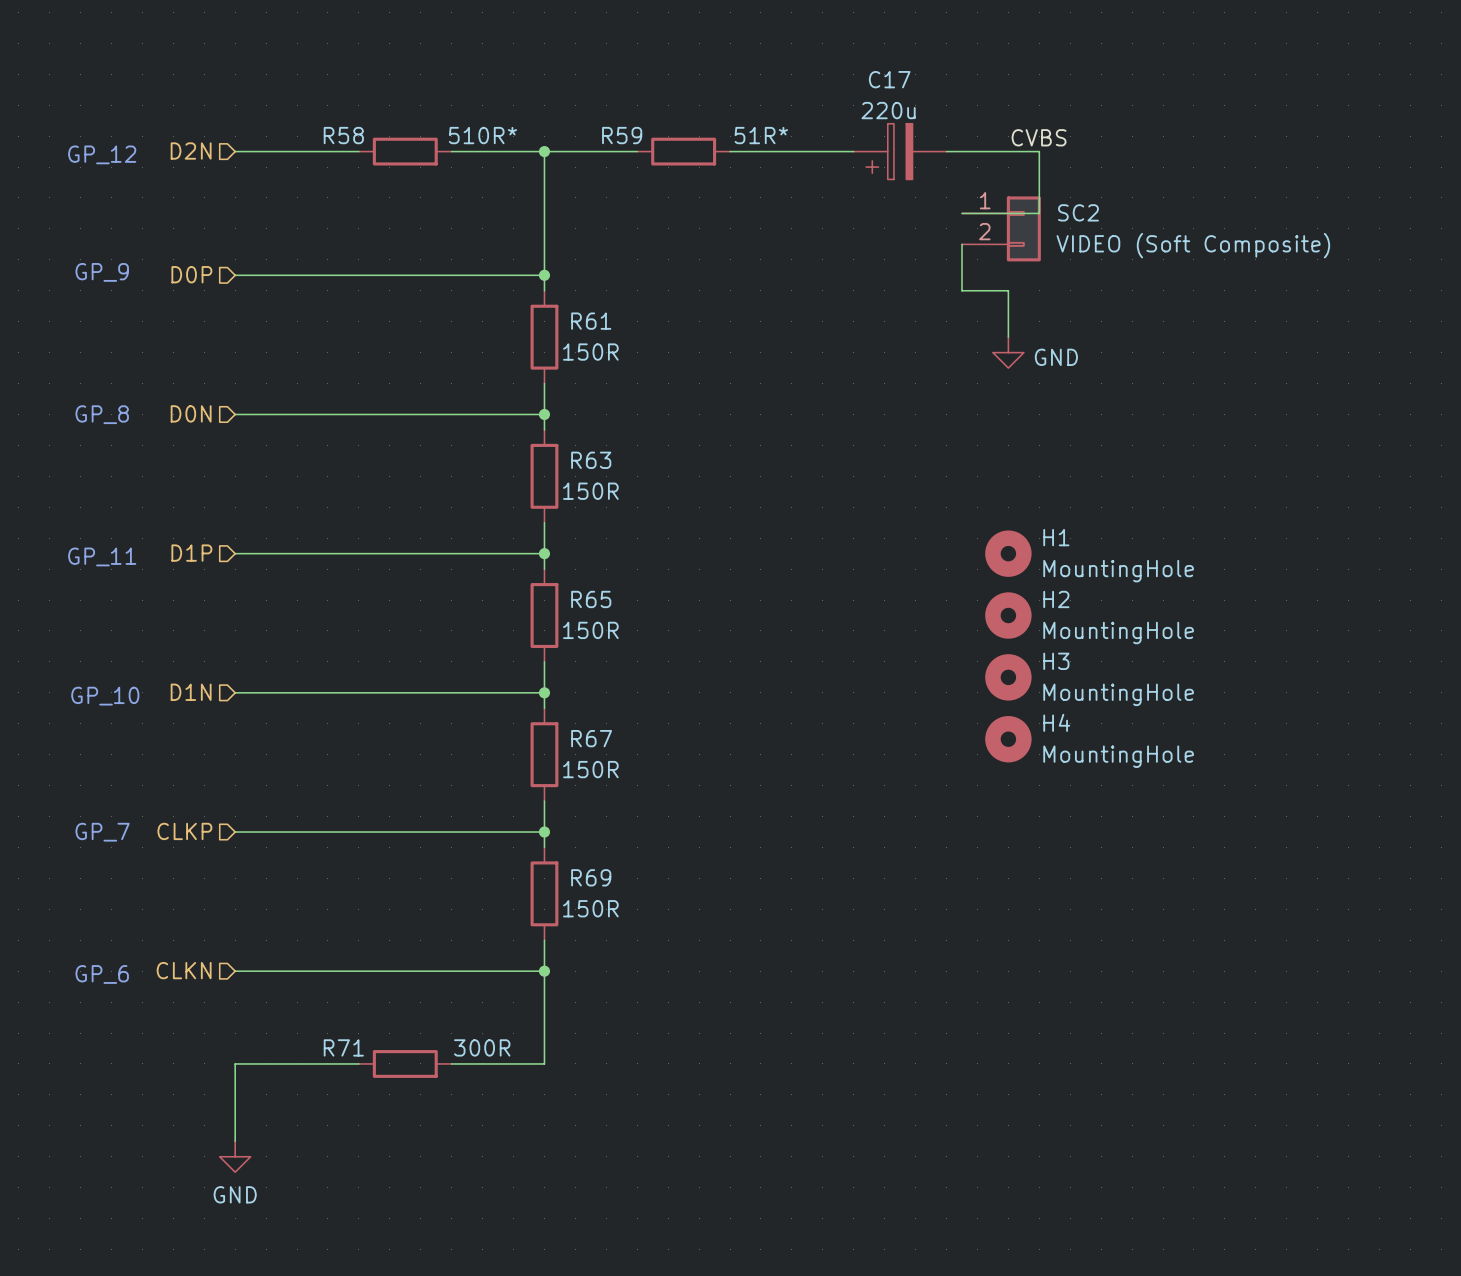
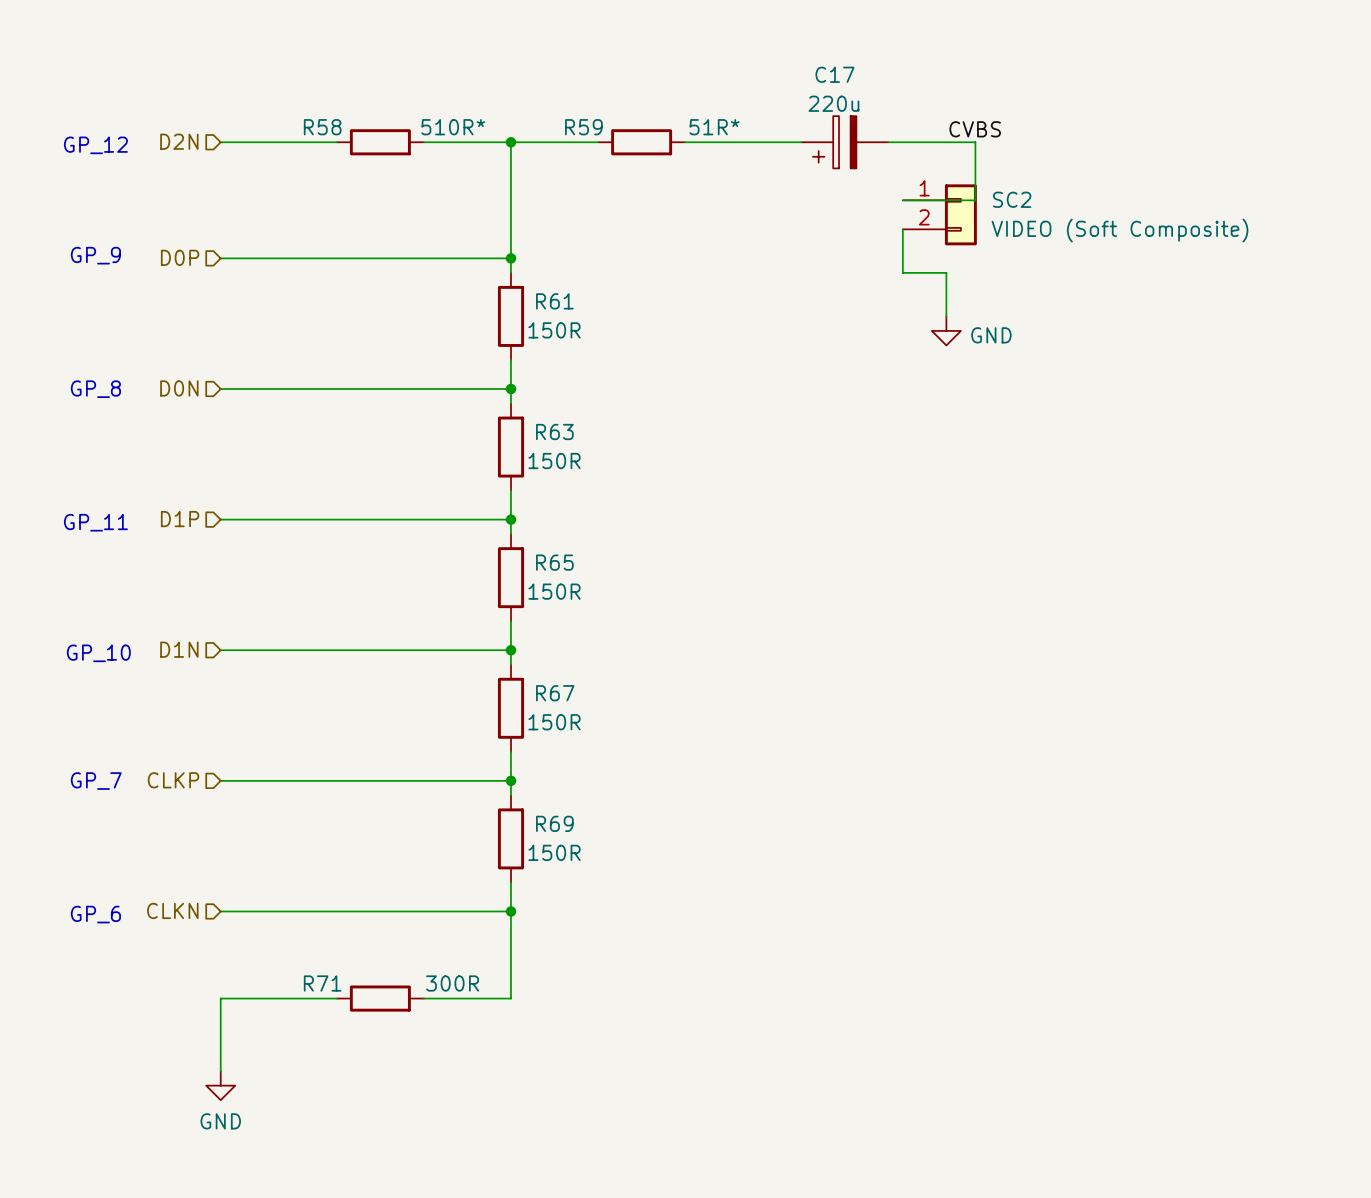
H1: MountingHole (1008, 553) -> none
H2: MountingHole (1008, 615) -> none
H3: MountingHole (1008, 677) -> none
H4: MountingHole (1008, 739) -> none

